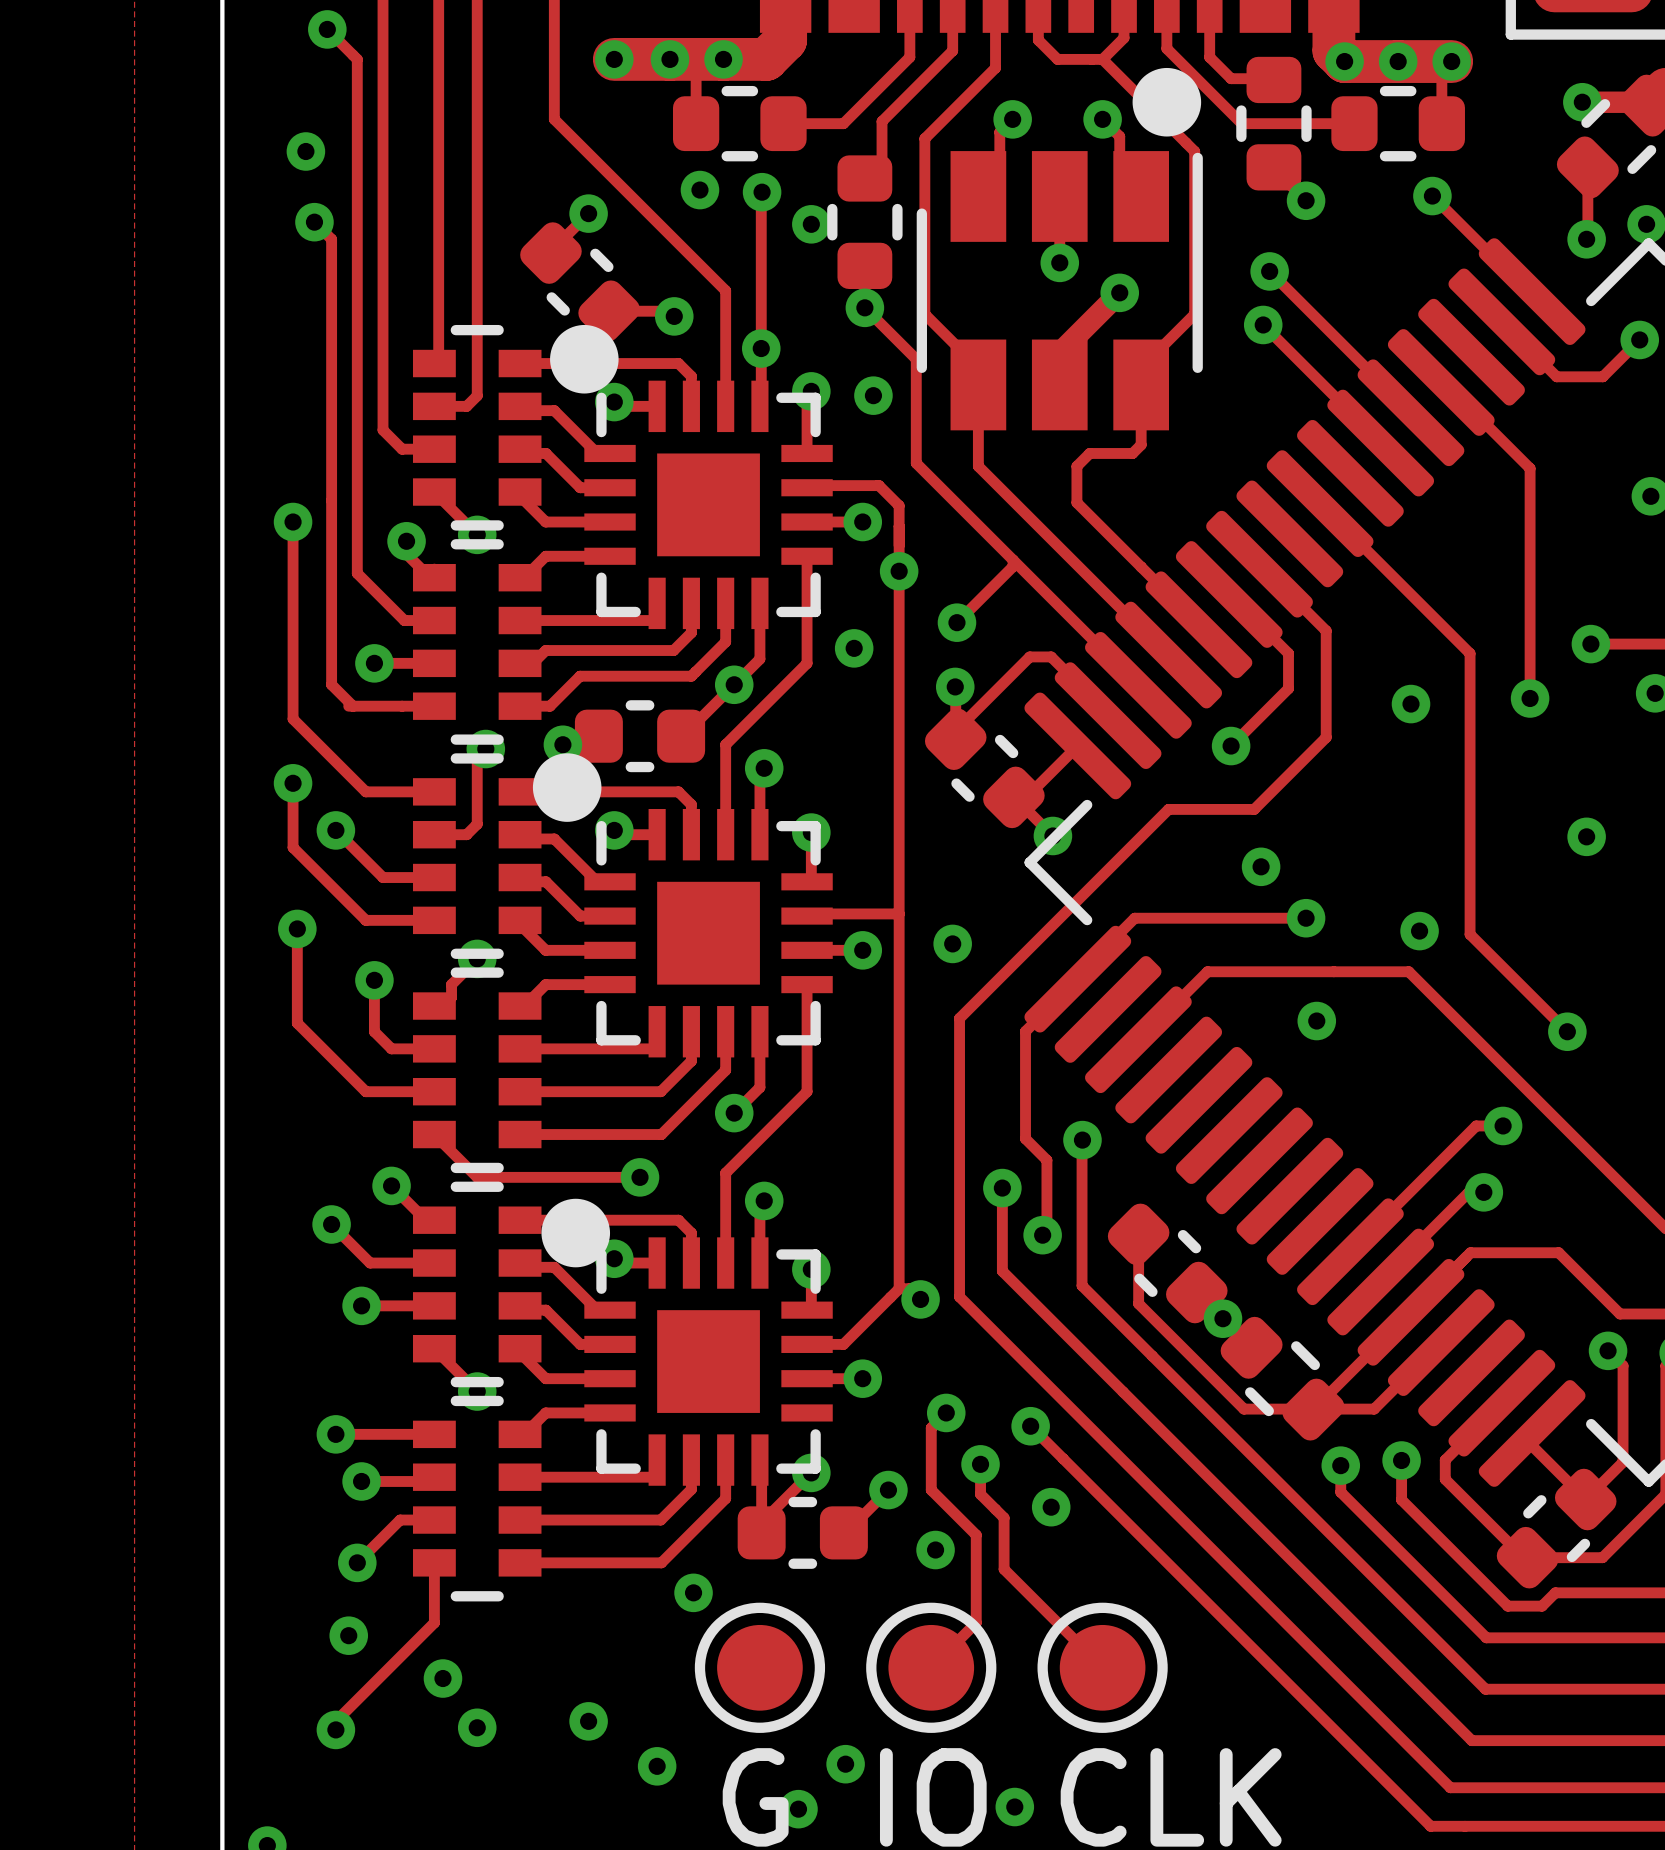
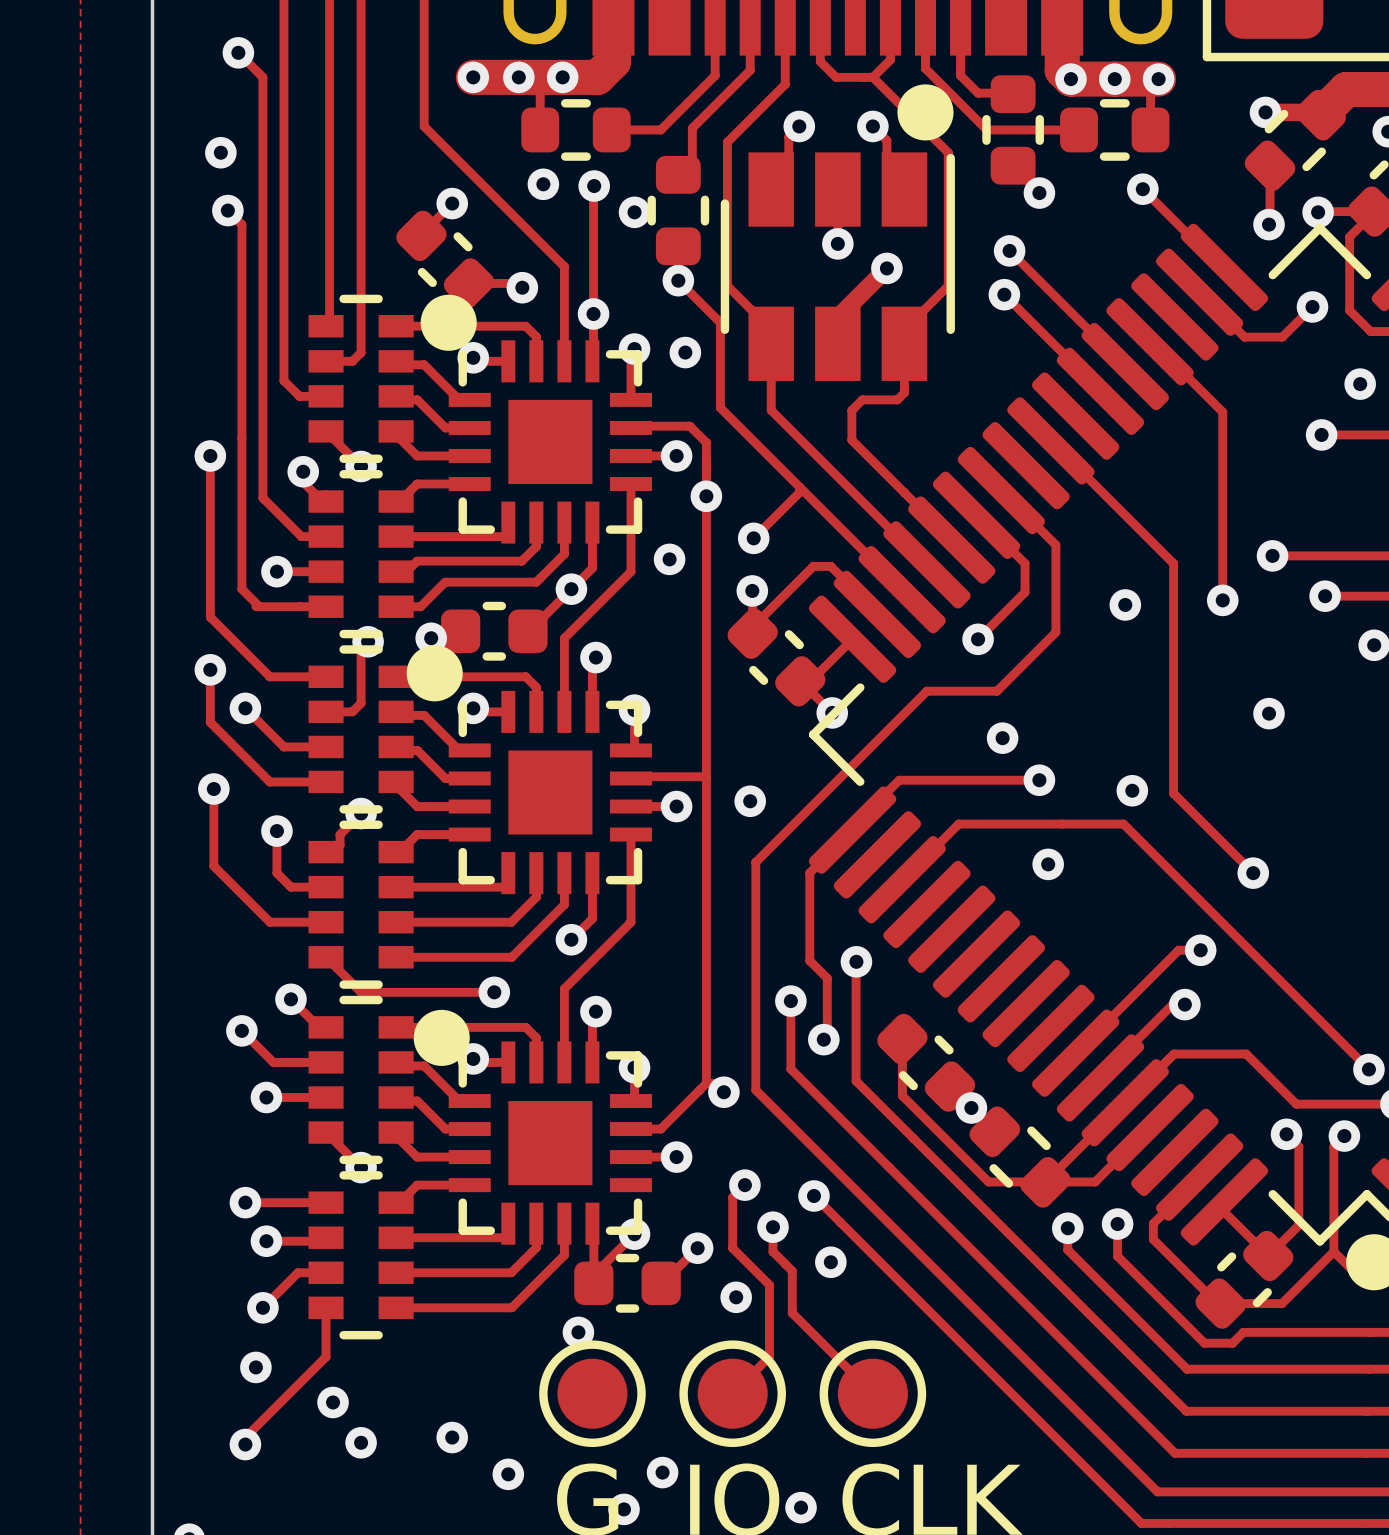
via position: (693, 1592) -> (578, 1332)

